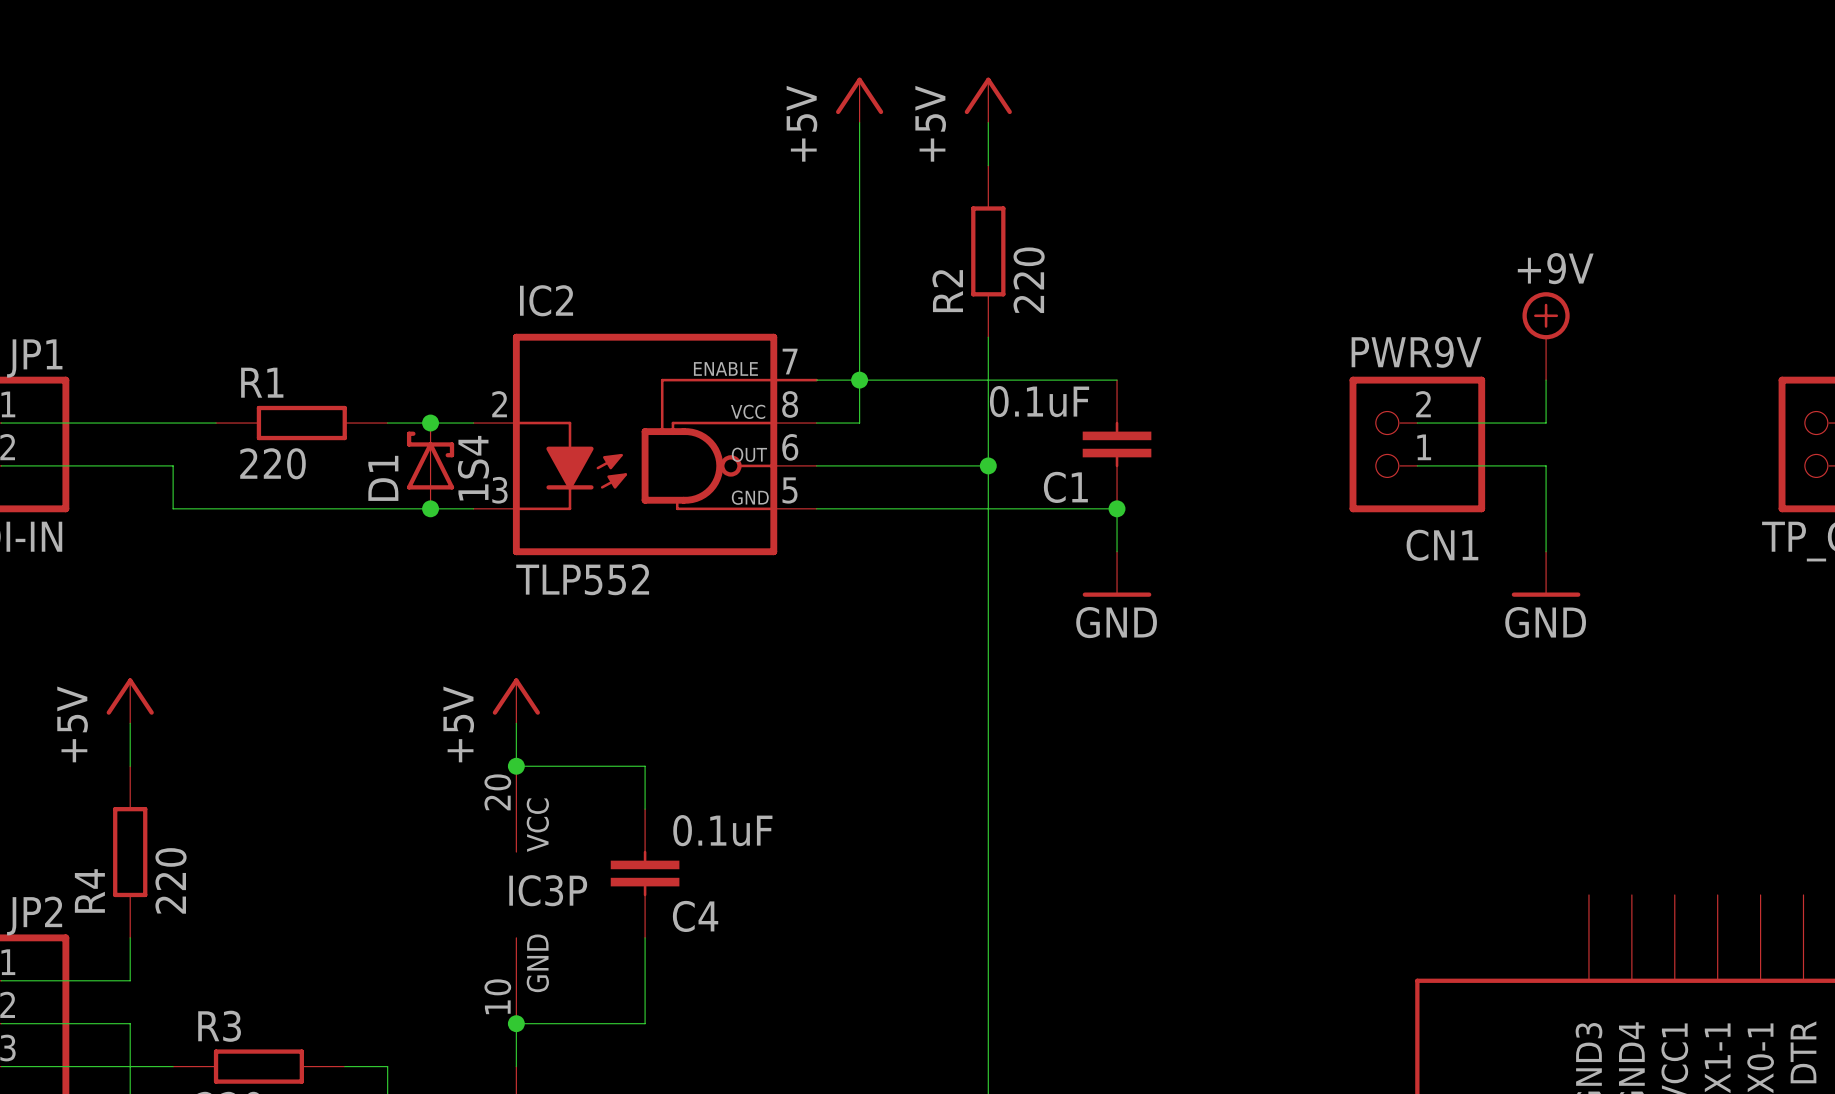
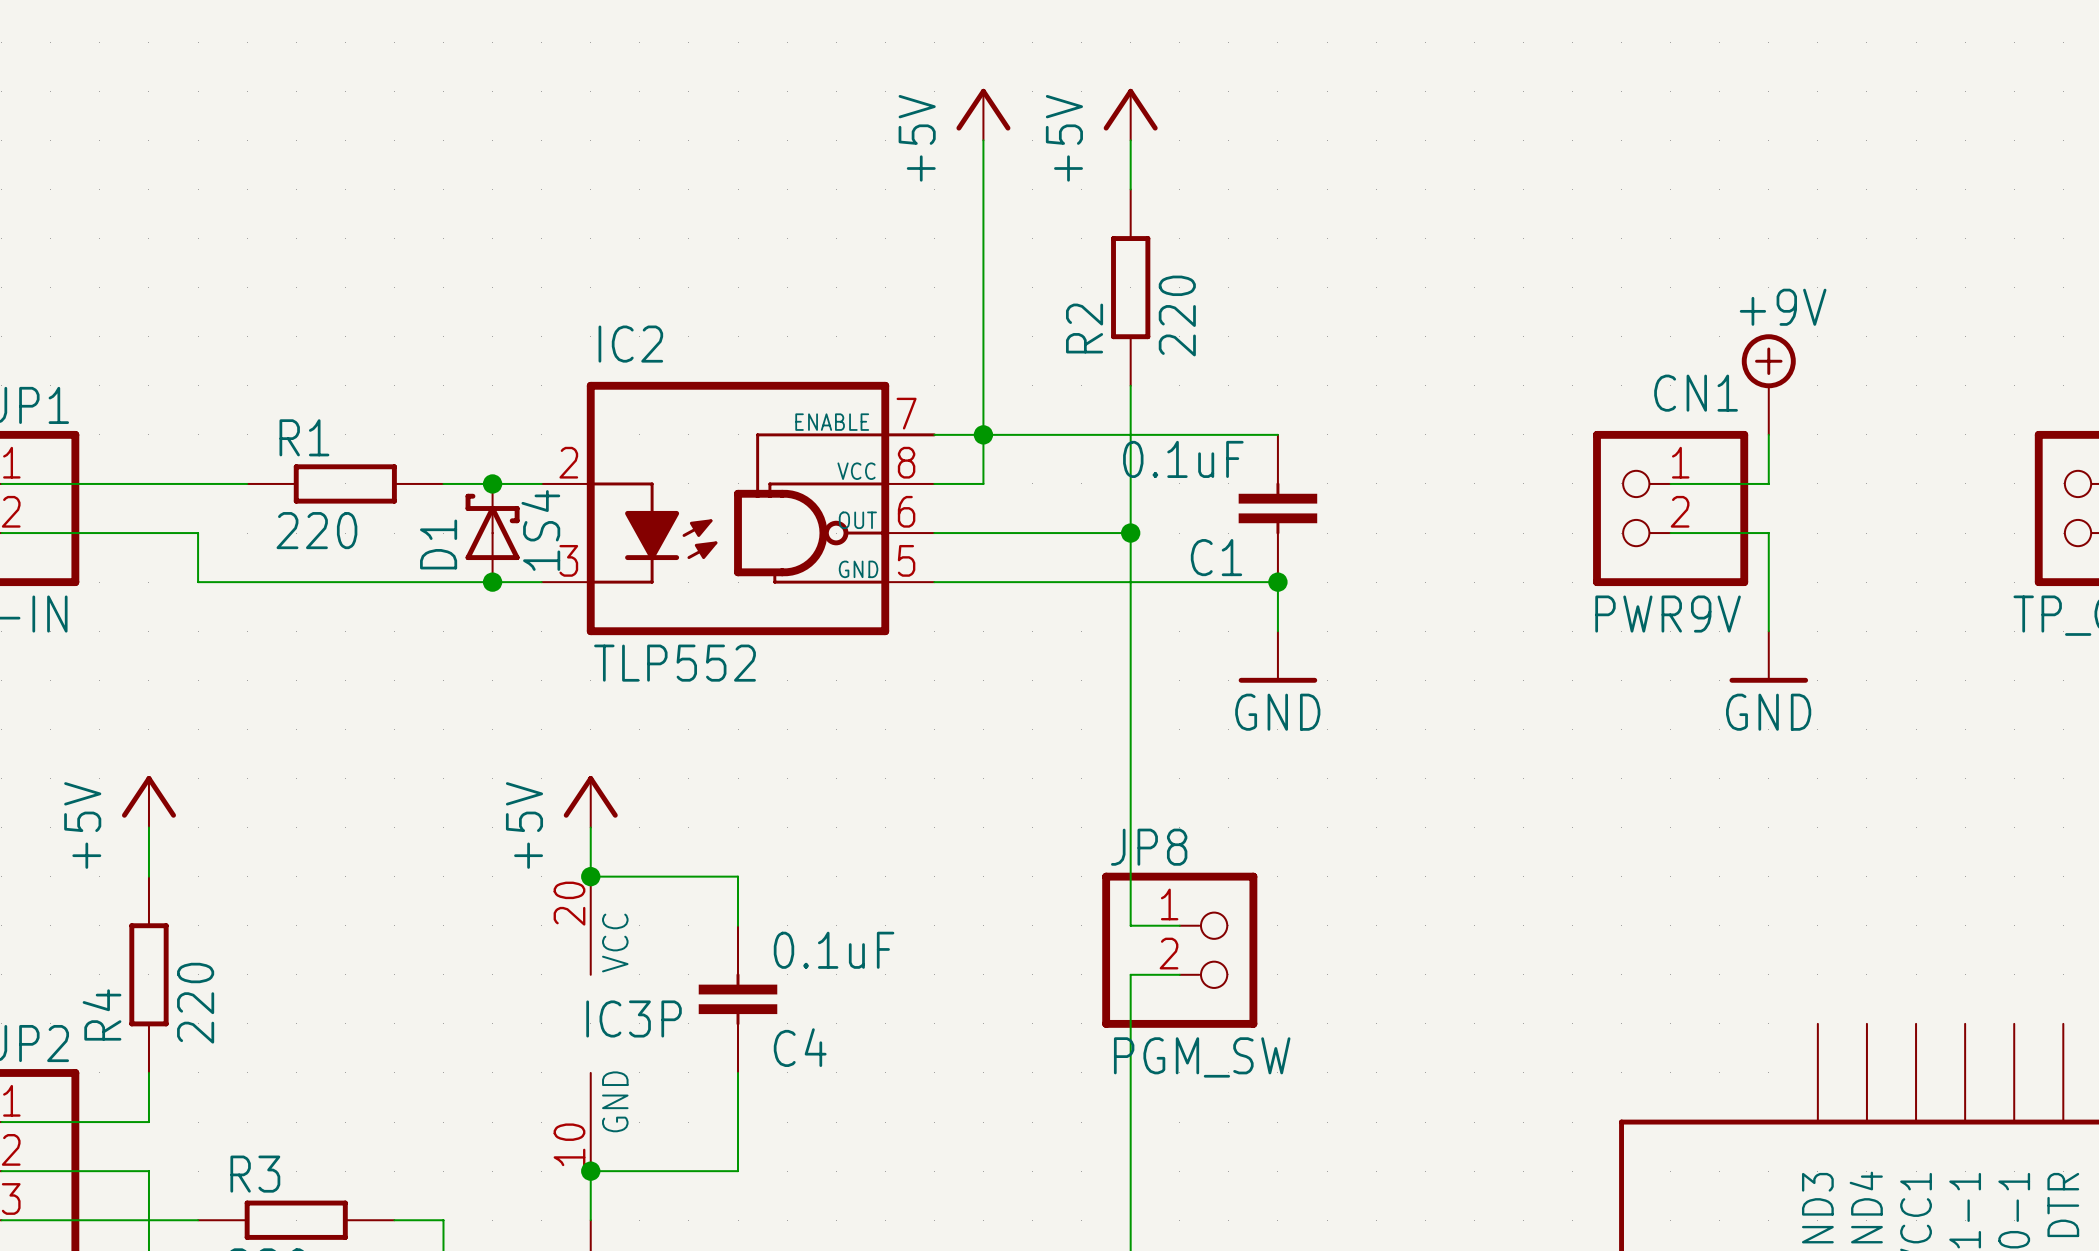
wire: (1417, 423) (1460, 423) -> none
CN1 flip: as is (1417, 444) -> up-down (1670, 508)
wire: (1417, 465) (1460, 465) -> none
wire: (988, 809) (988, 852) -> (1130, 925) (1179, 925)
JP8: none -> PGM_SW (1179, 950)
wire: none -> (1130, 974) (1179, 974)

